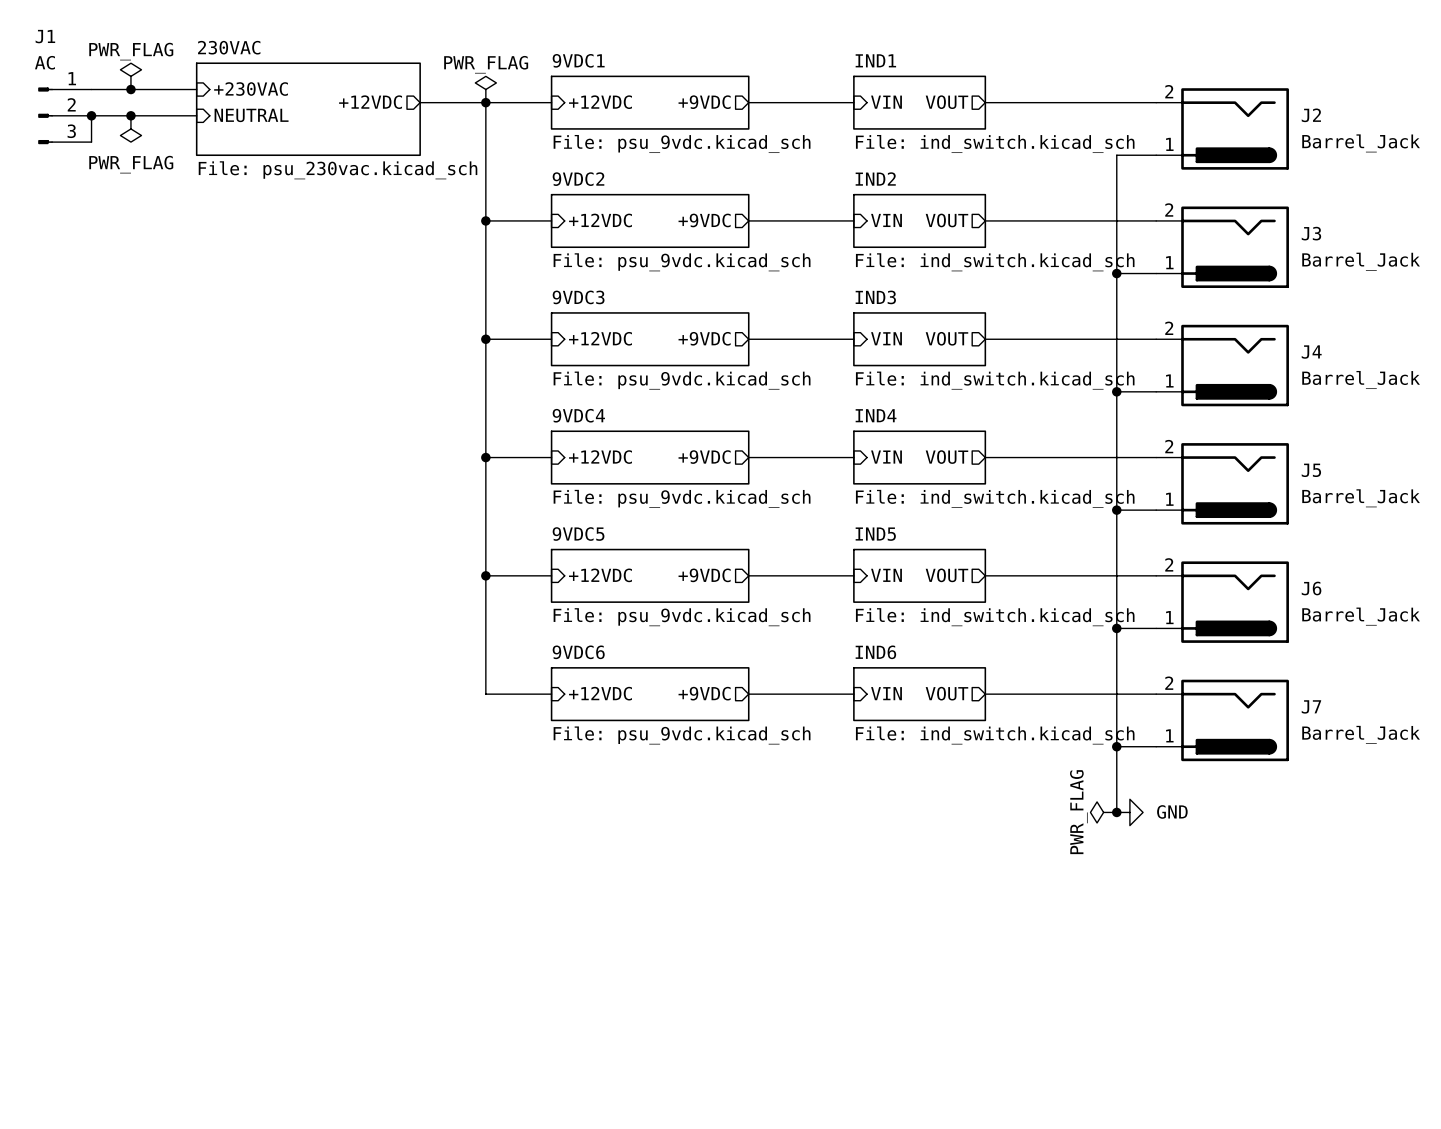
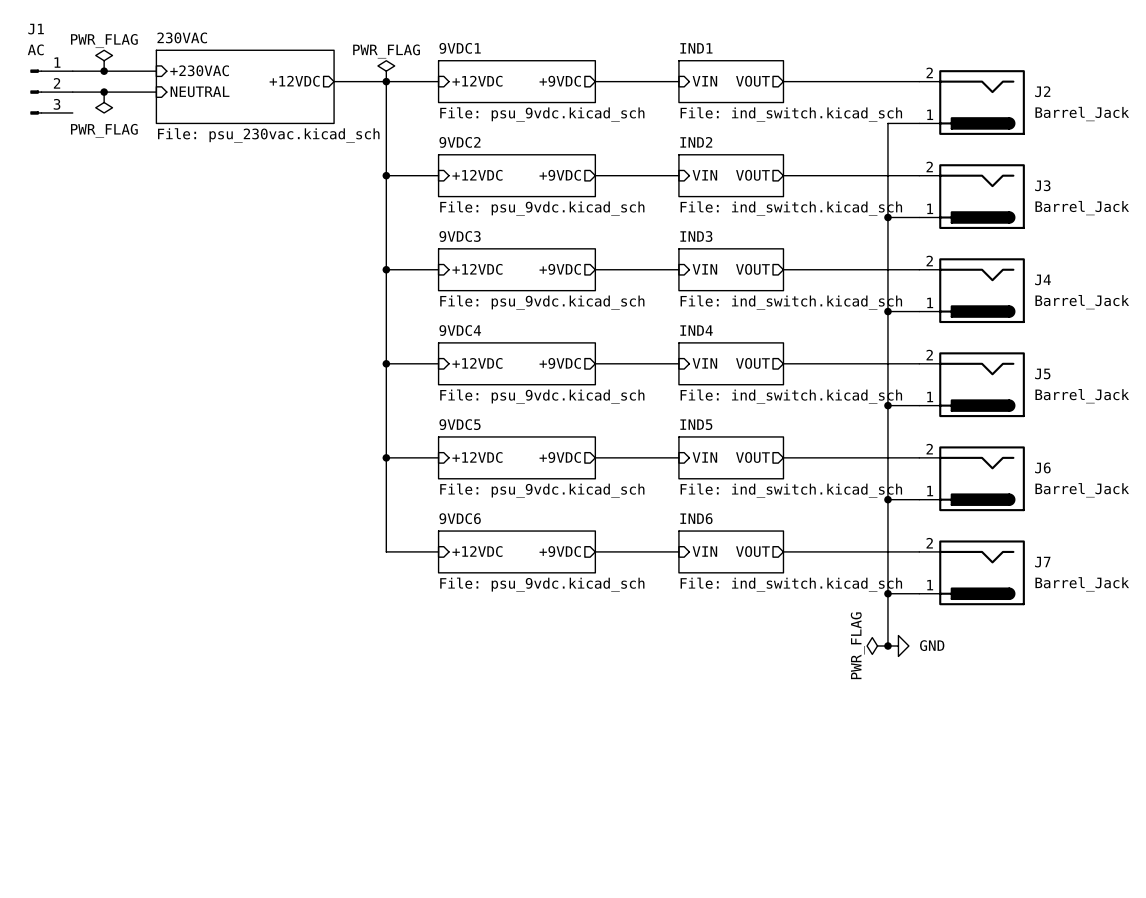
wire: (91, 115) (91, 142) -> none
junction: (91, 115) -> none

